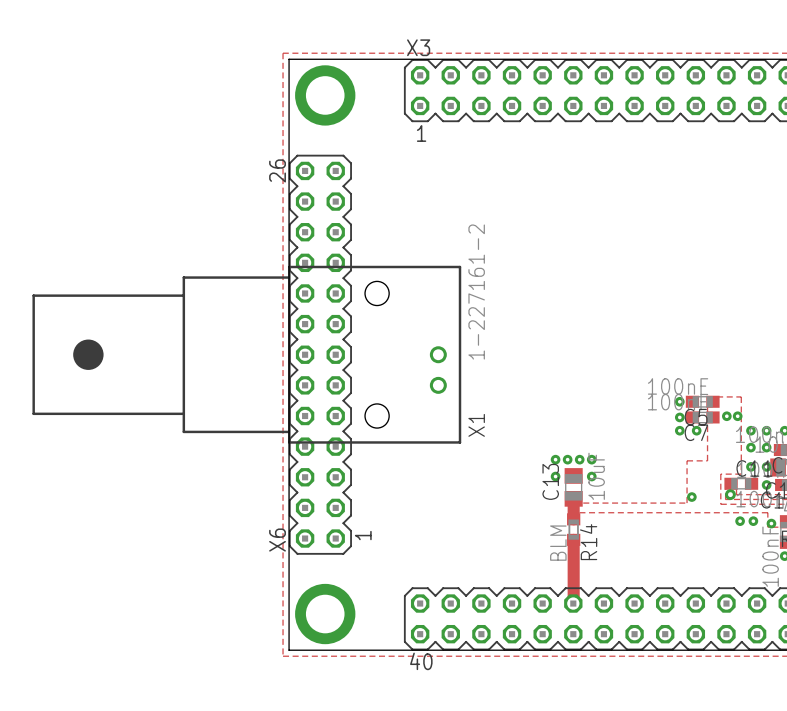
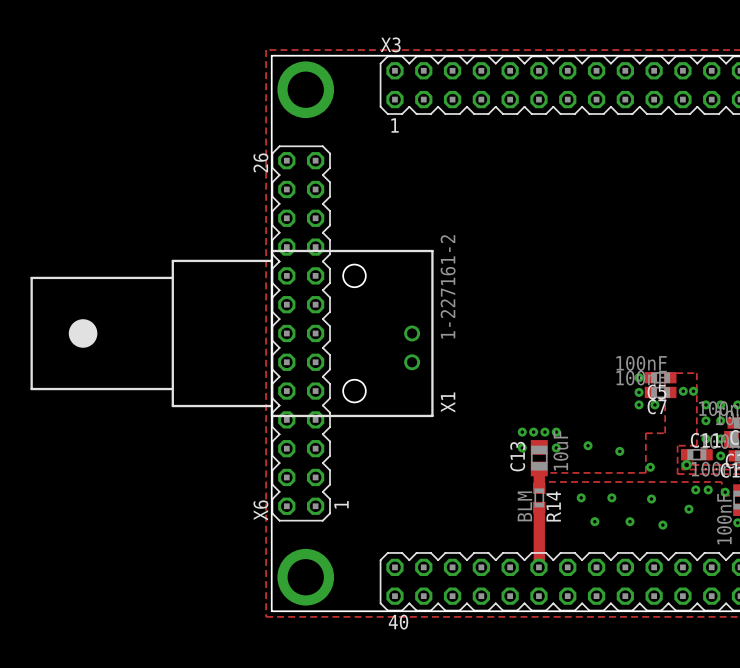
via: none -> (588, 445)
via: none -> (619, 451)
via: none -> (581, 497)
via: none -> (611, 497)
via: none -> (651, 499)
via: none -> (688, 509)
via: none -> (594, 521)
via: none -> (629, 521)
via: none -> (662, 525)

